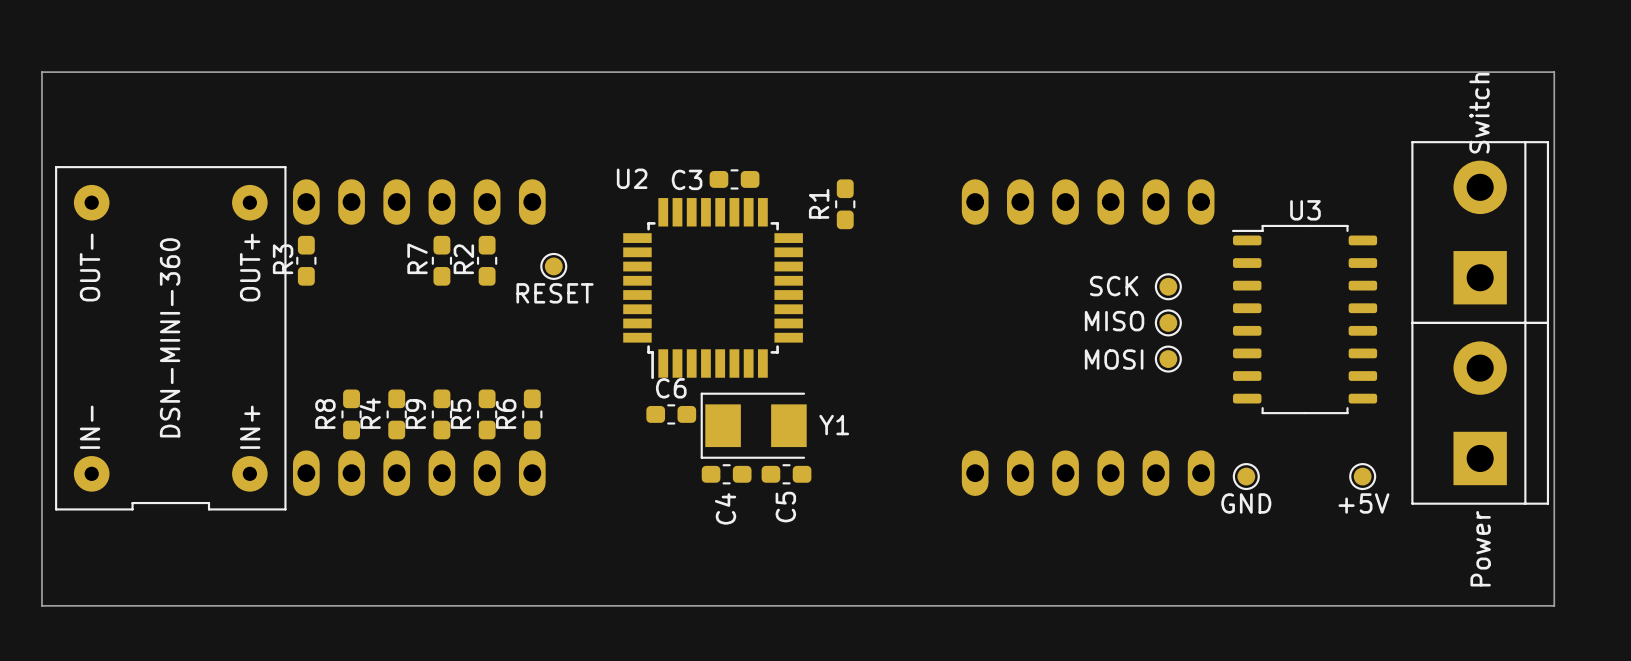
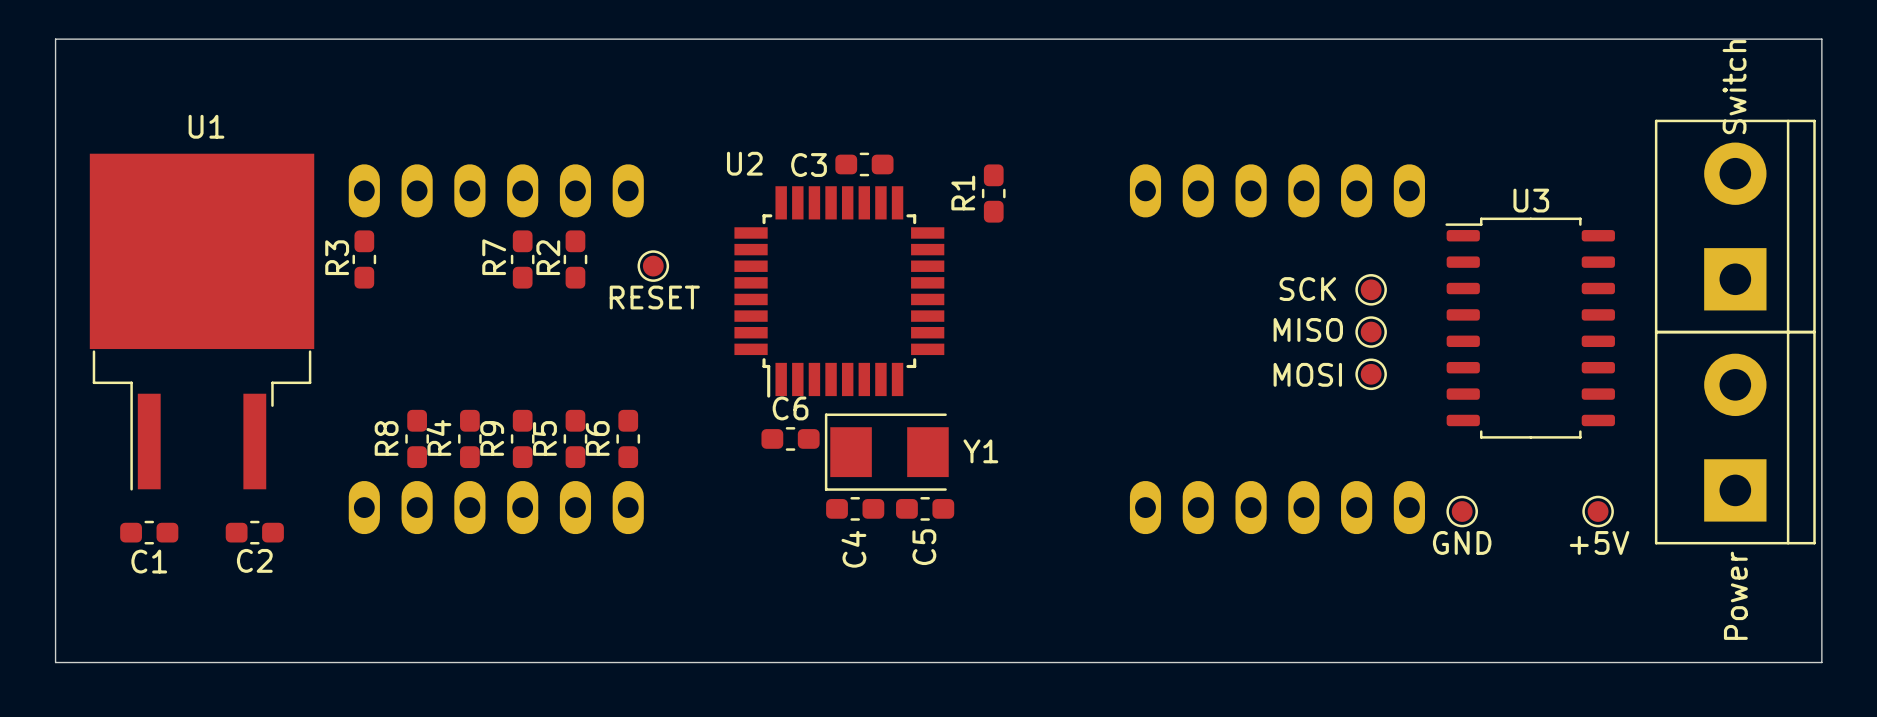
U1: none -> (202, 322)
part: DSN-MINI-360 (170, 338) -> none
C1: none -> (149, 532)
C2: none -> (254, 532)

